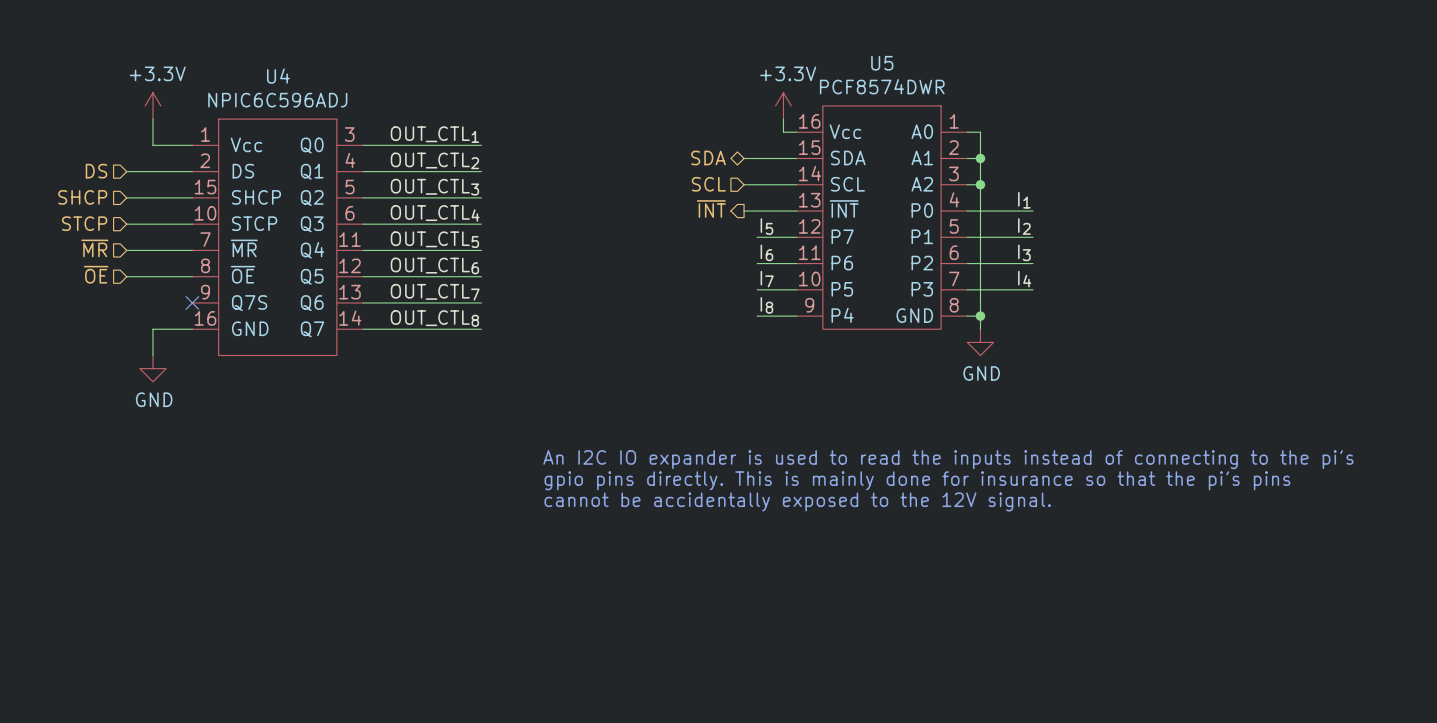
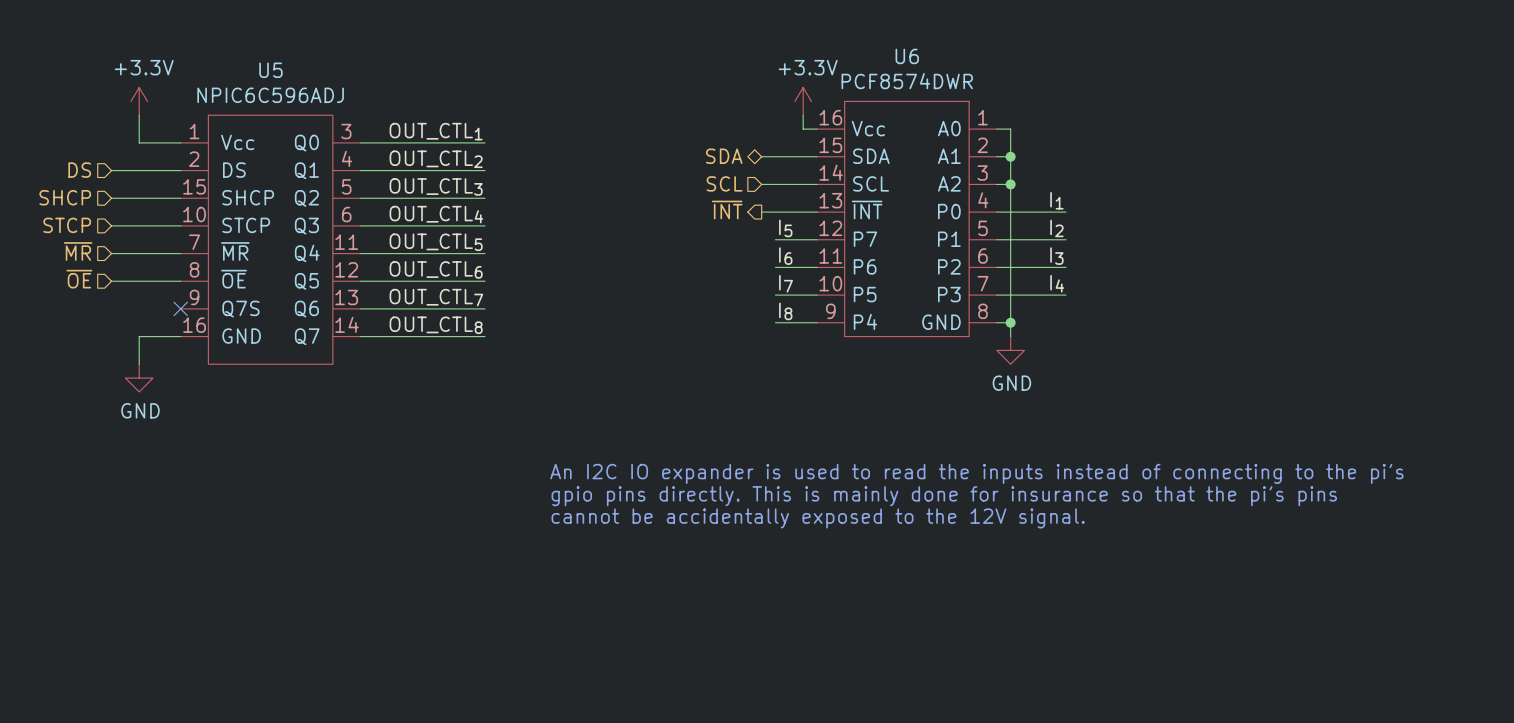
U5 name: U5 (882, 63) -> U6 (907, 56)
U4 name: U4 (278, 76) -> U5 (270, 70)

